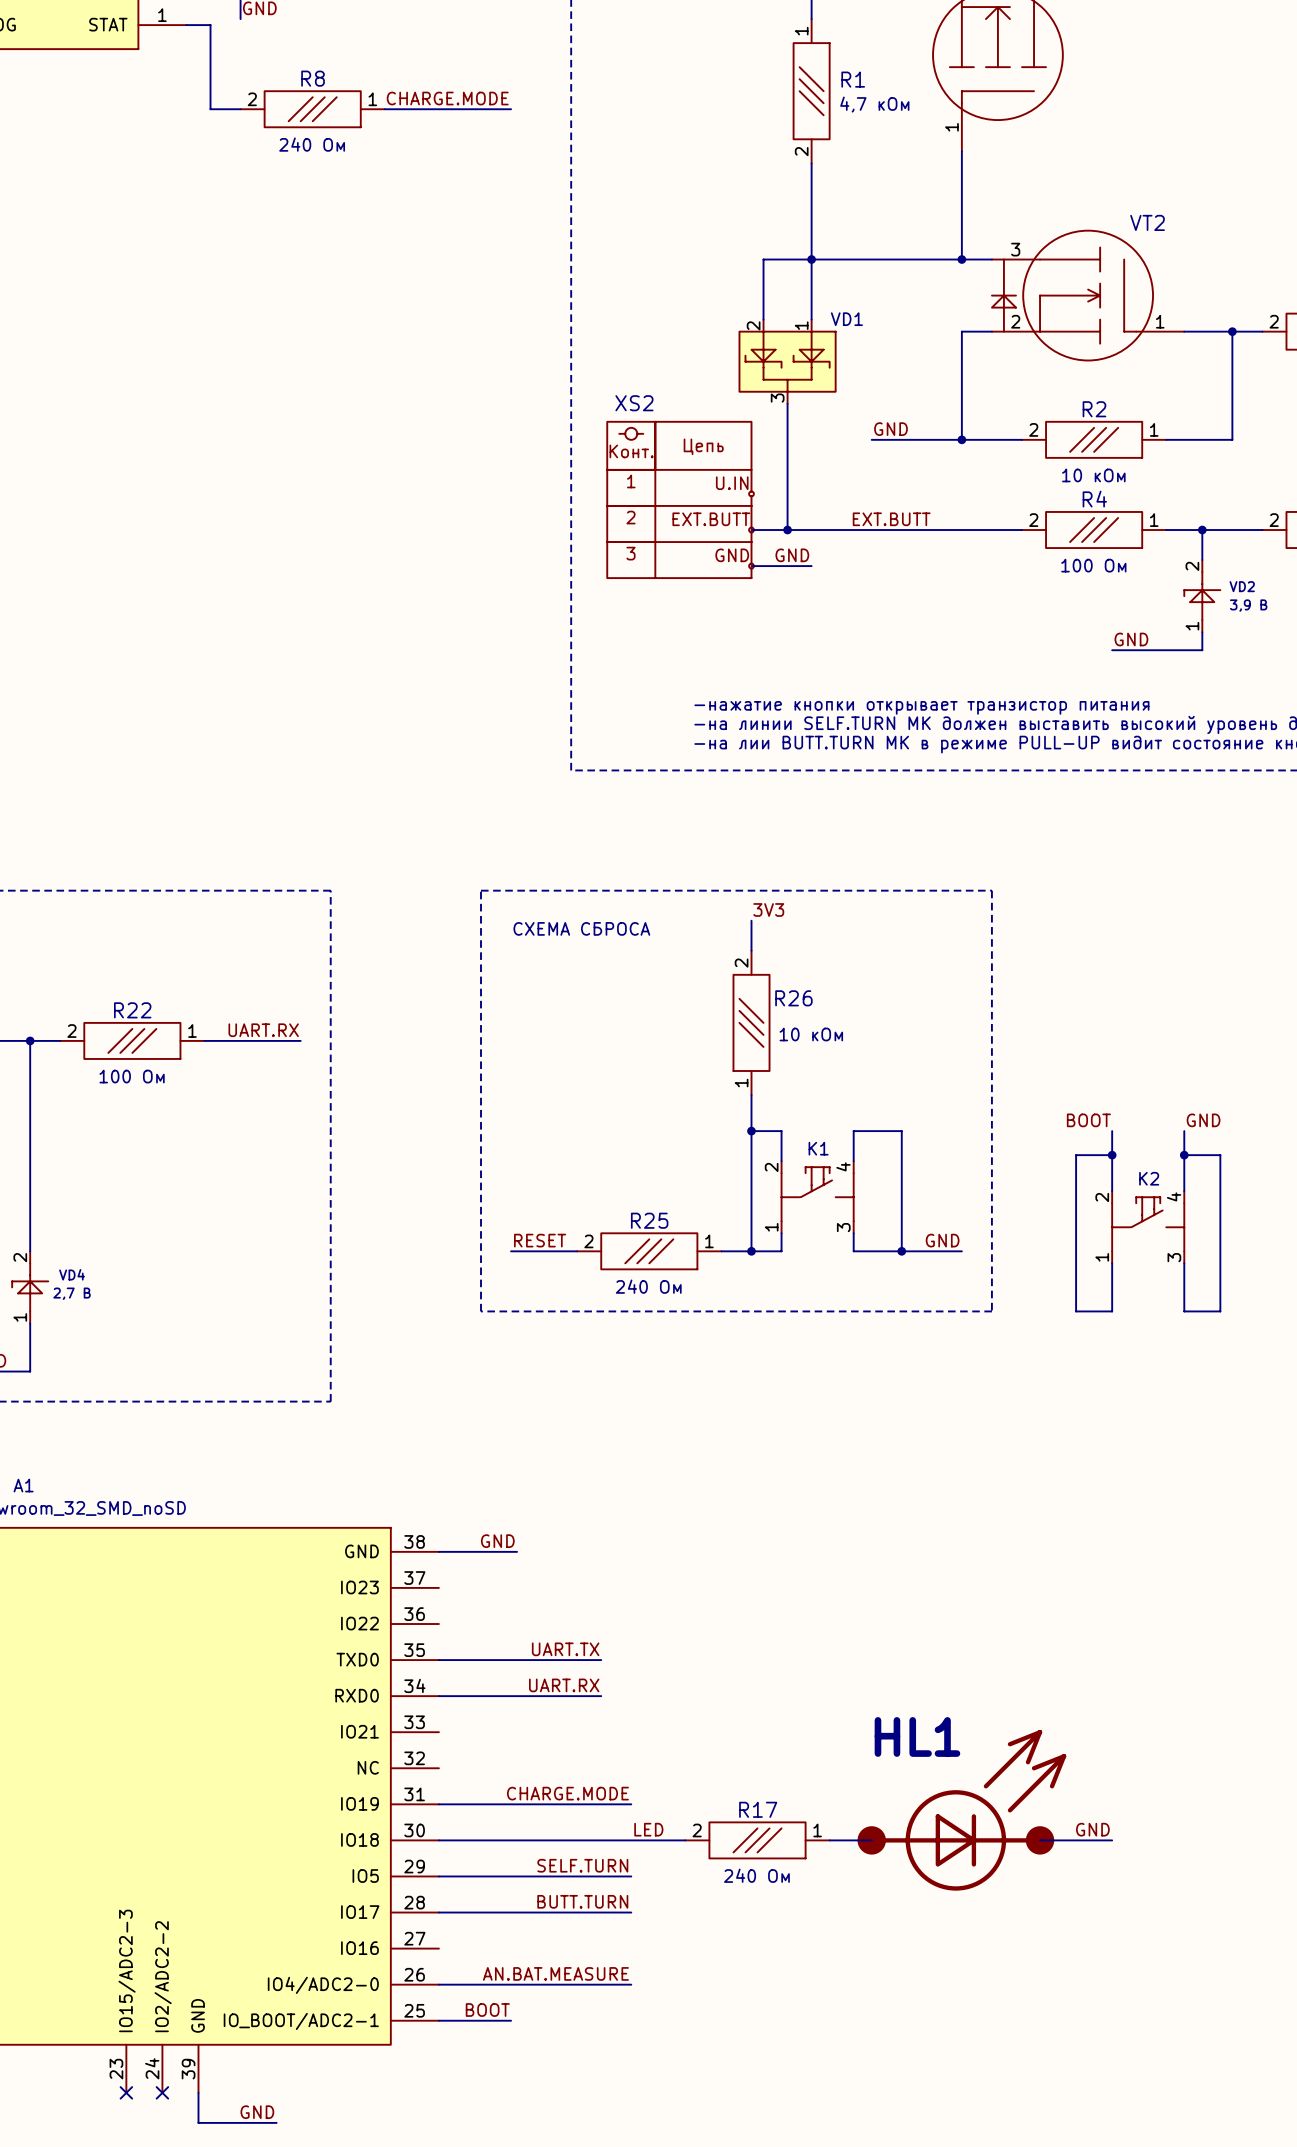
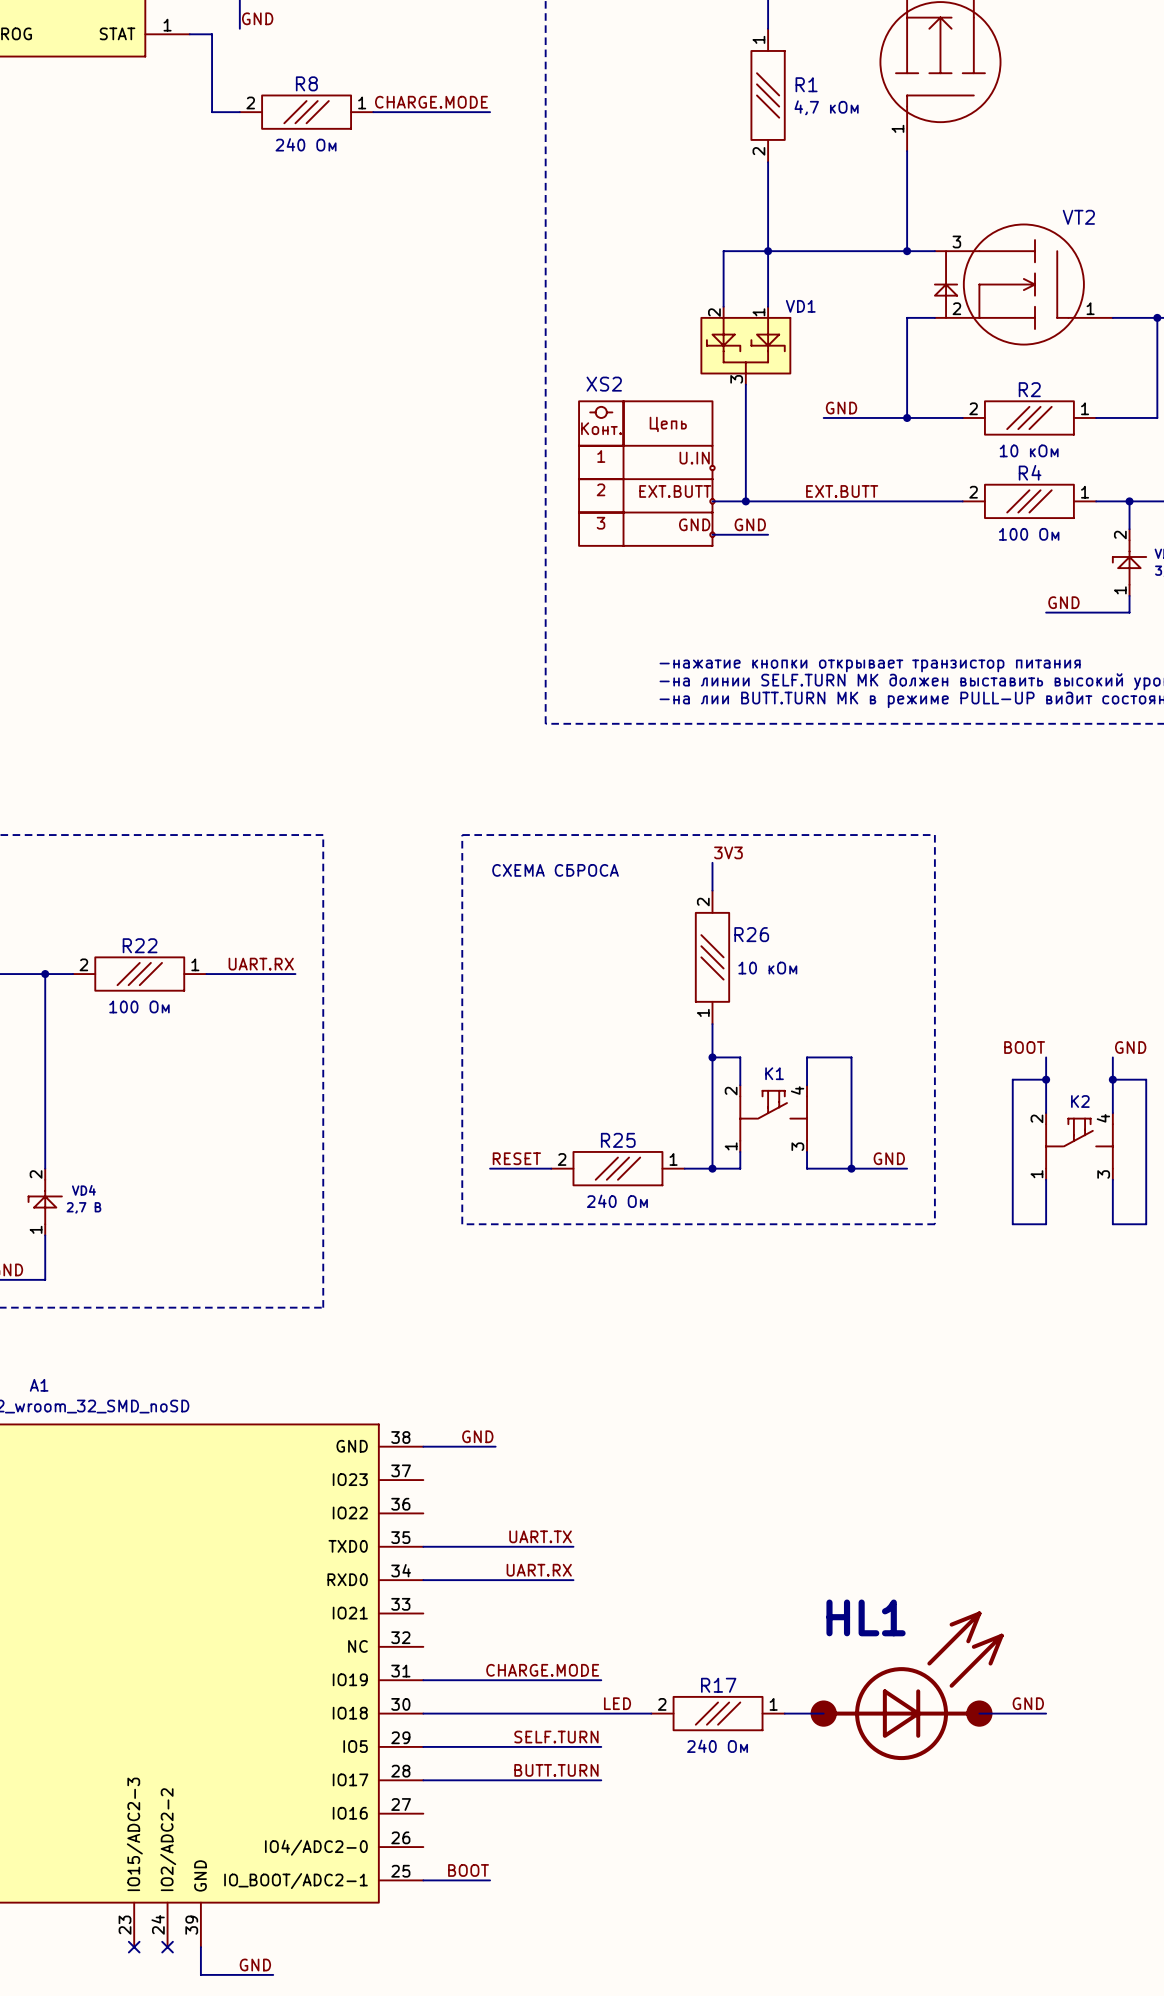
label: AN.BAT.MEASURE (555, 1973) -> none
wire: (438, 1984) (631, 1984) -> none

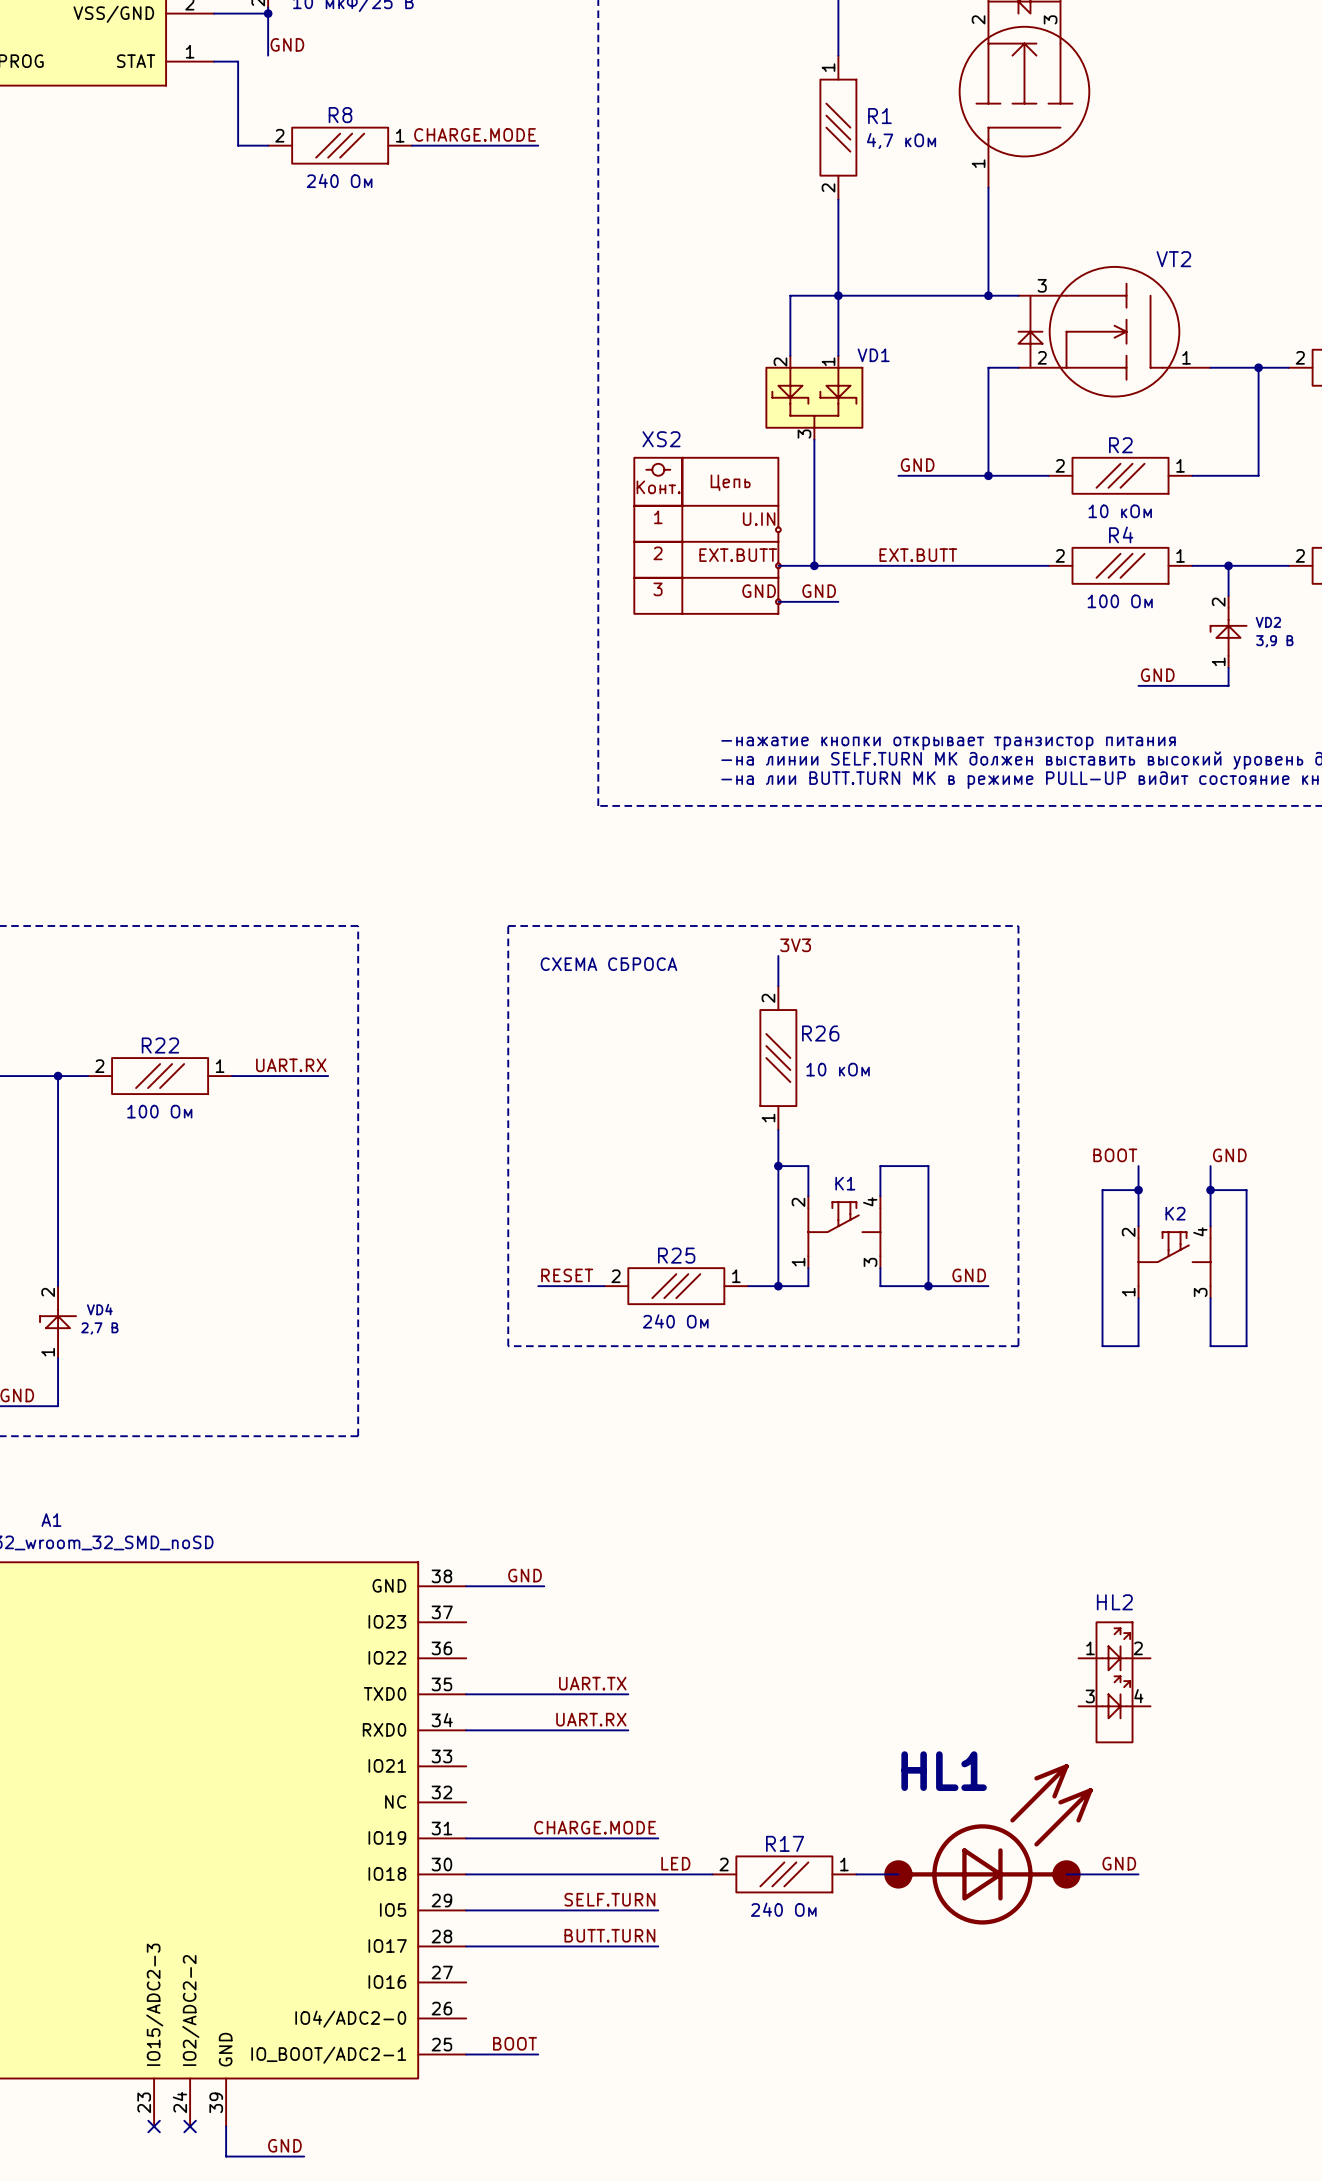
HL2: none -> (1114, 1682)

